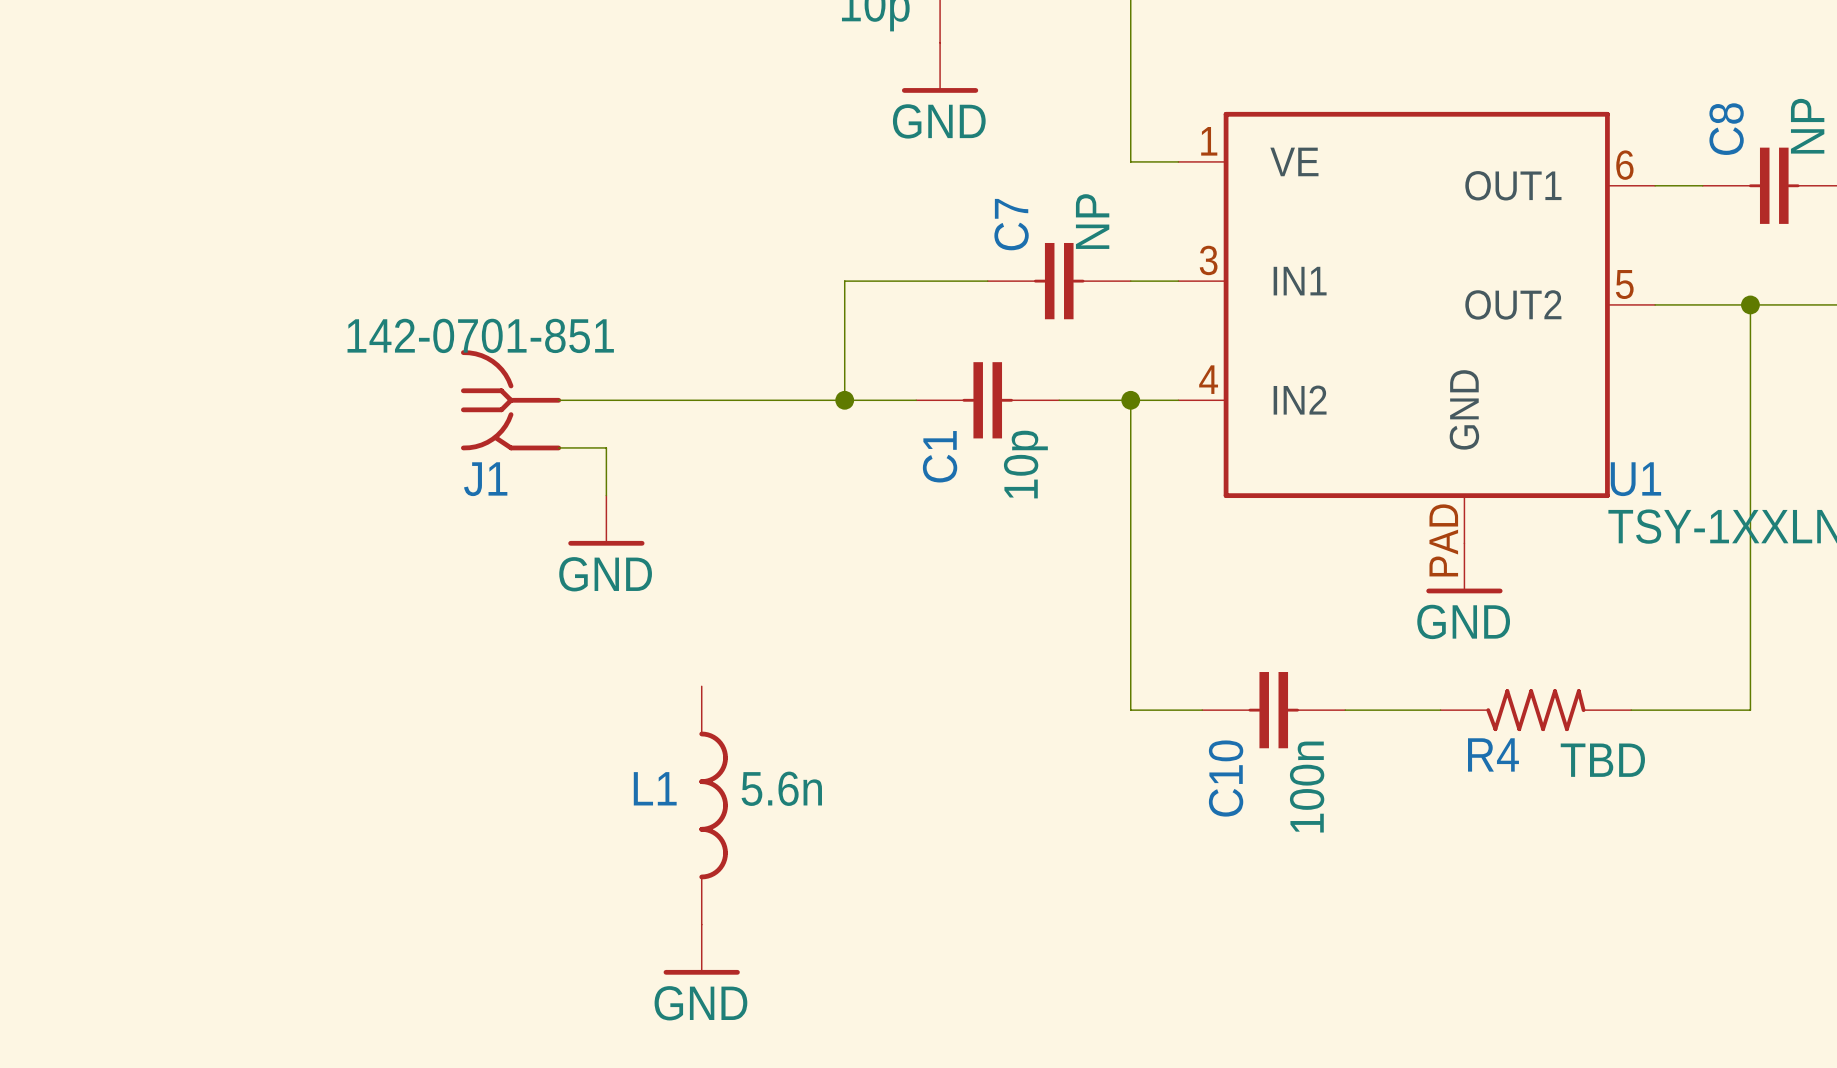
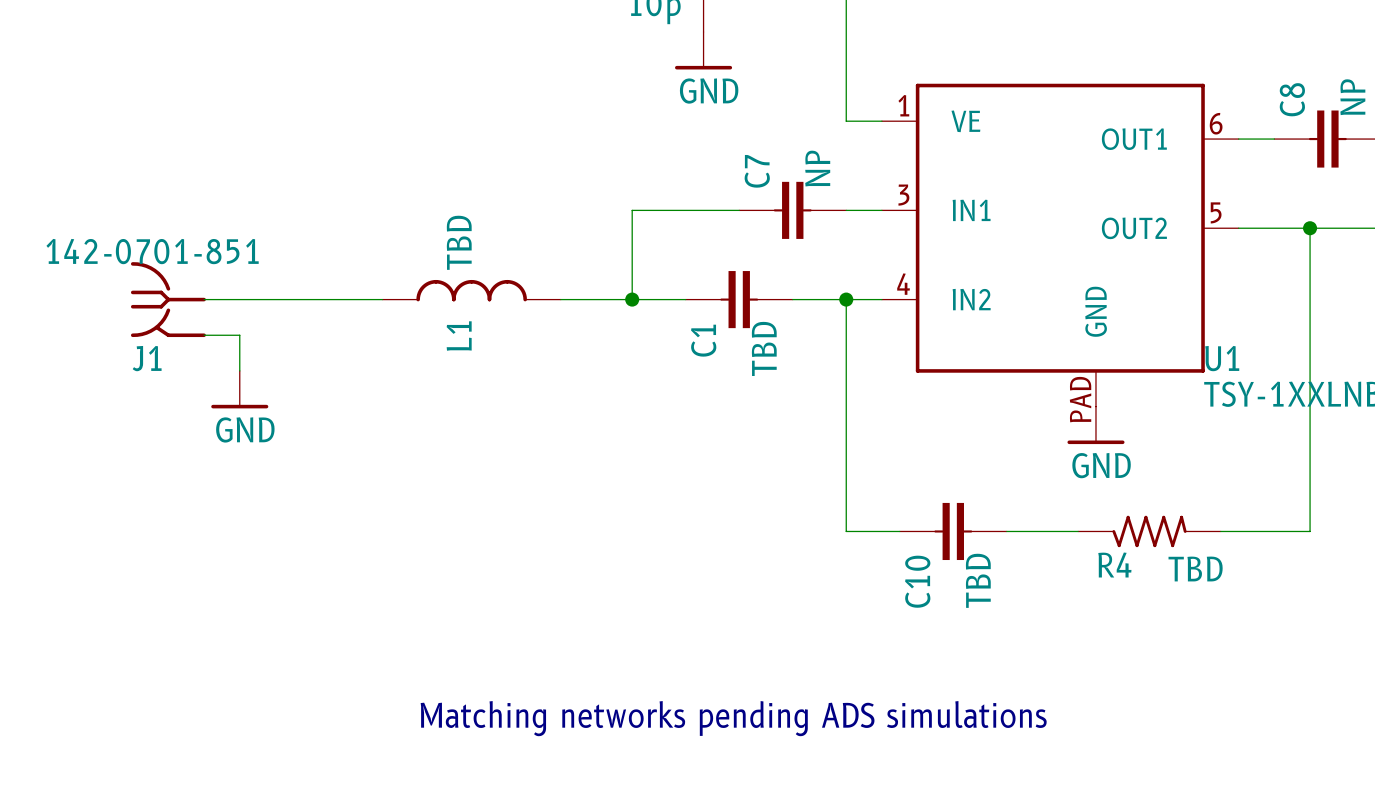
wire: none -> (204, 299) (382, 299)
J1 position: (511, 400) -> (168, 299)
wire: (558, 400) (749, 400) -> none
wire: (558, 447) (606, 447) (606, 495) -> (204, 335) (239, 335) (239, 370)
C1 value: 10p (1025, 464) -> TBD (764, 348)
power symbol position: GND (606, 520) -> GND (239, 389)
C10 value: 100n (1307, 787) -> TBD (978, 580)
L1 value: 5.6n (781, 788) -> TBD (459, 242)
L1 rotation: 0° (713, 805) -> 90° counterclockwise (471, 290)
L1 position: (713, 805) -> (471, 290)
power symbol: GND (701, 949) -> none
text: none -> Matching networks pending ADS simulations (733, 718)

